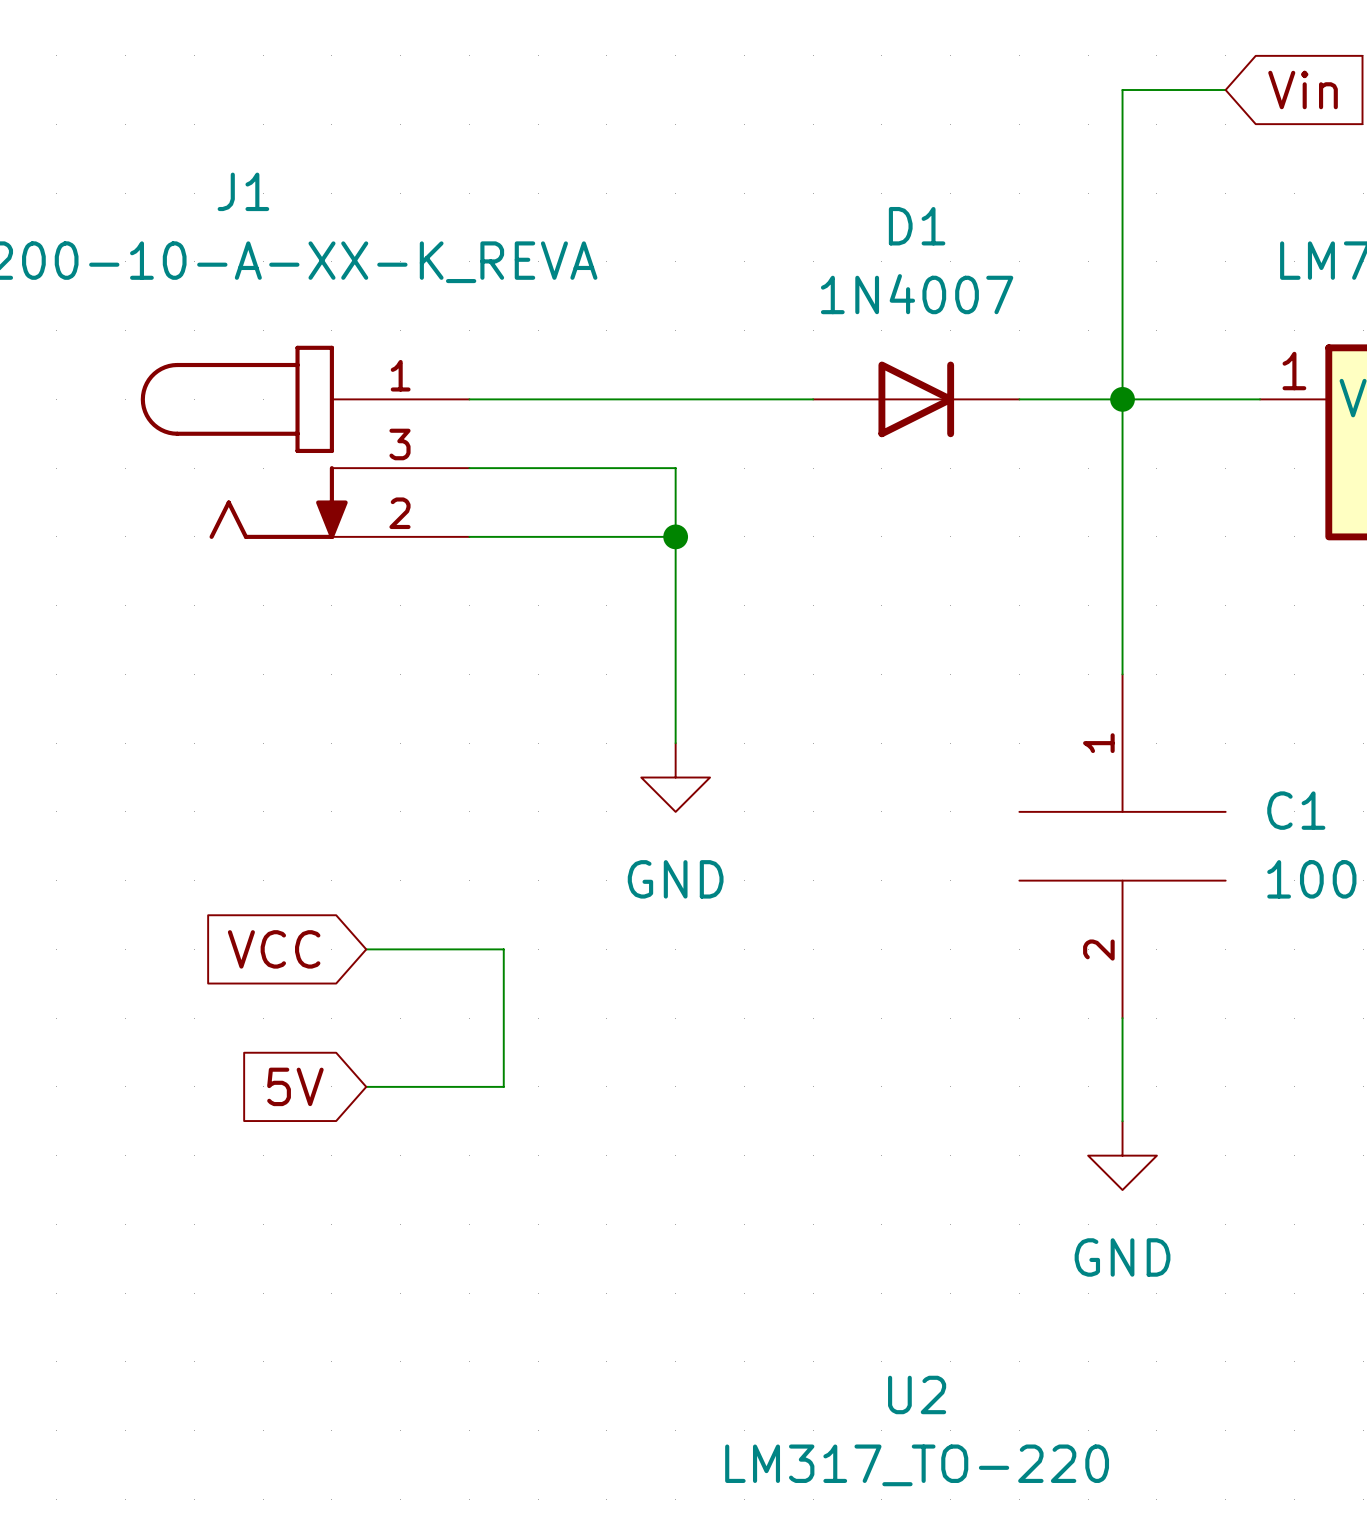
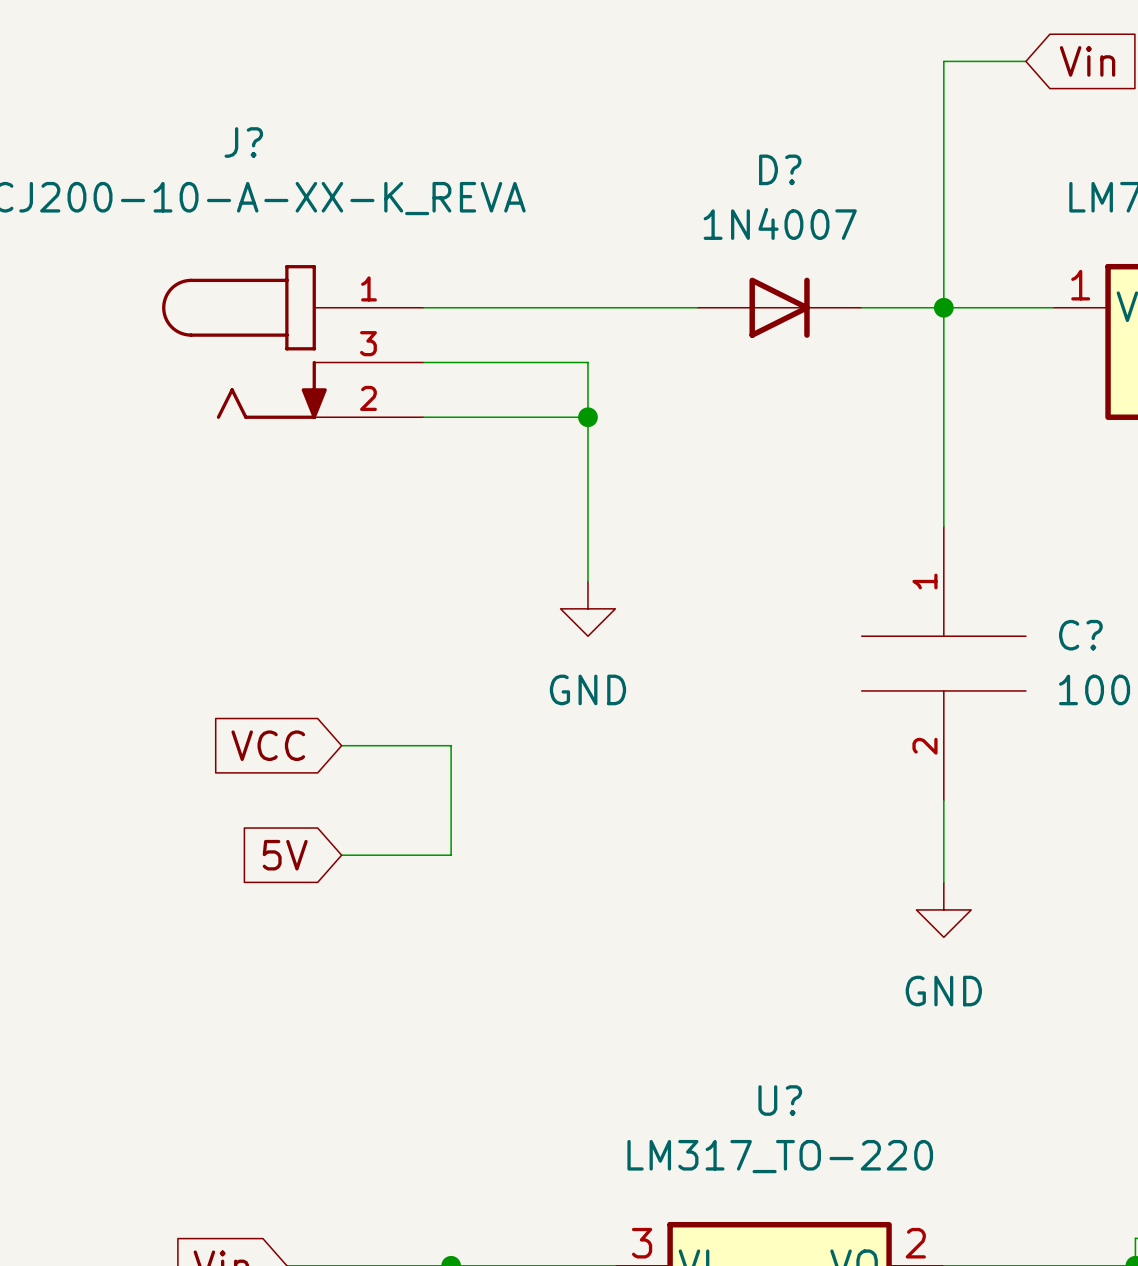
J1 name: J1 (243, 191) -> J? (243, 142)
D1 name: D1 (917, 226) -> D? (780, 169)
C1 name: C1 (1296, 810) -> C? (1080, 635)
U2 name: U2 (917, 1394) -> U? (780, 1100)

